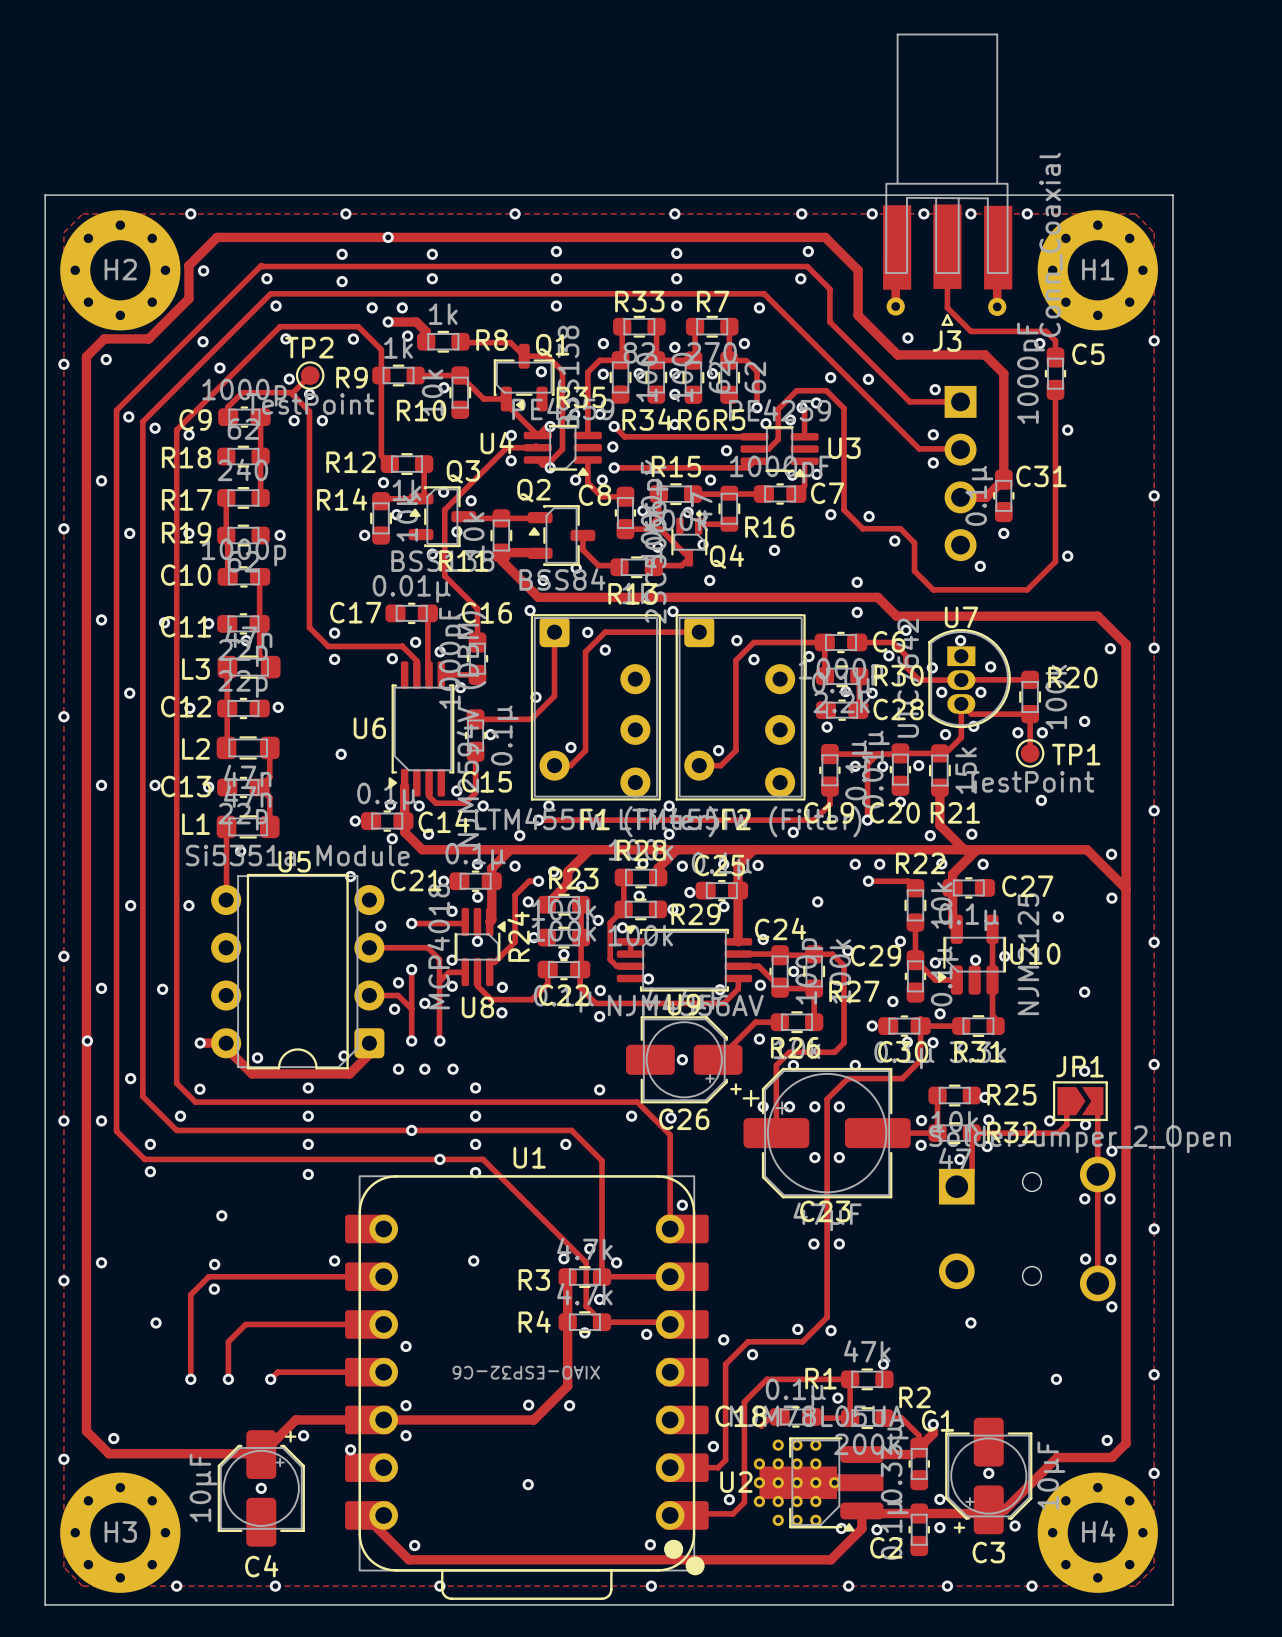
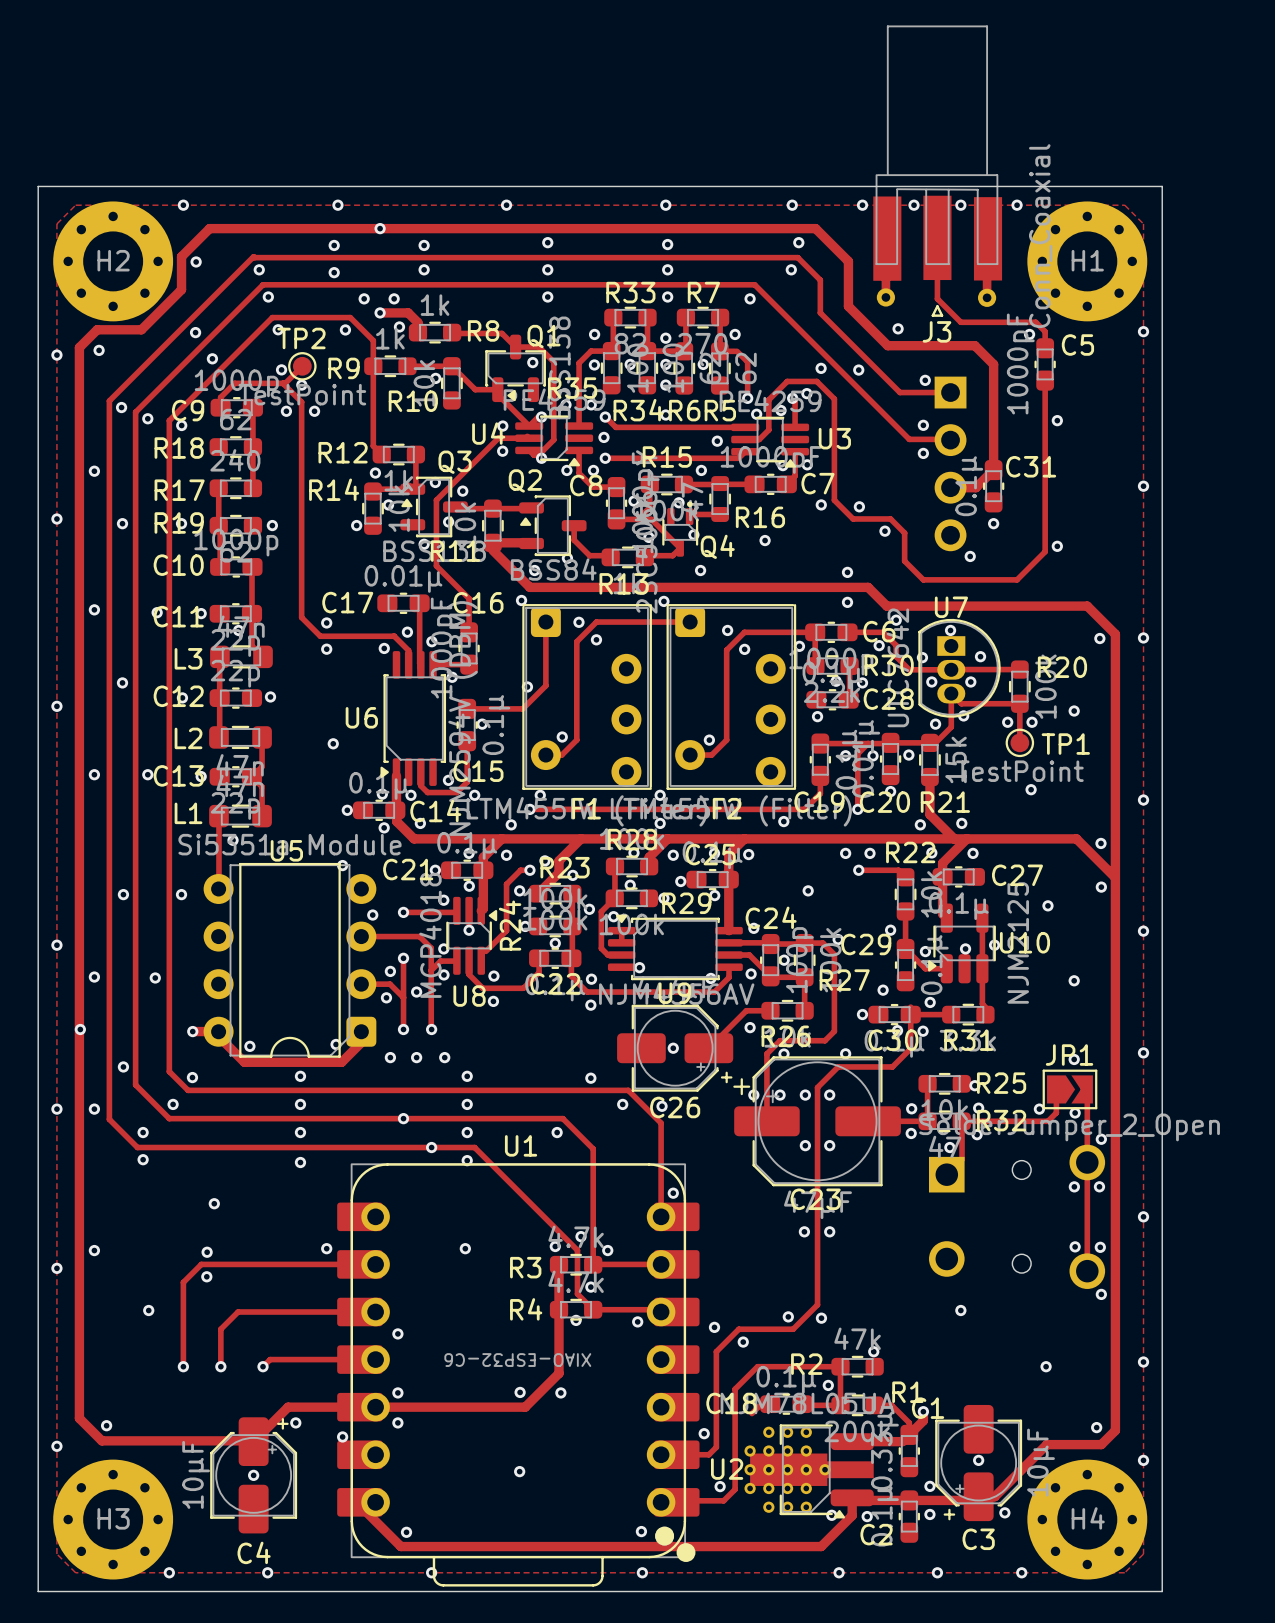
R1 name position: R1 (820, 1378) -> R1 (907, 1392)
R2 name position: R2 (914, 1397) -> R2 (806, 1364)

